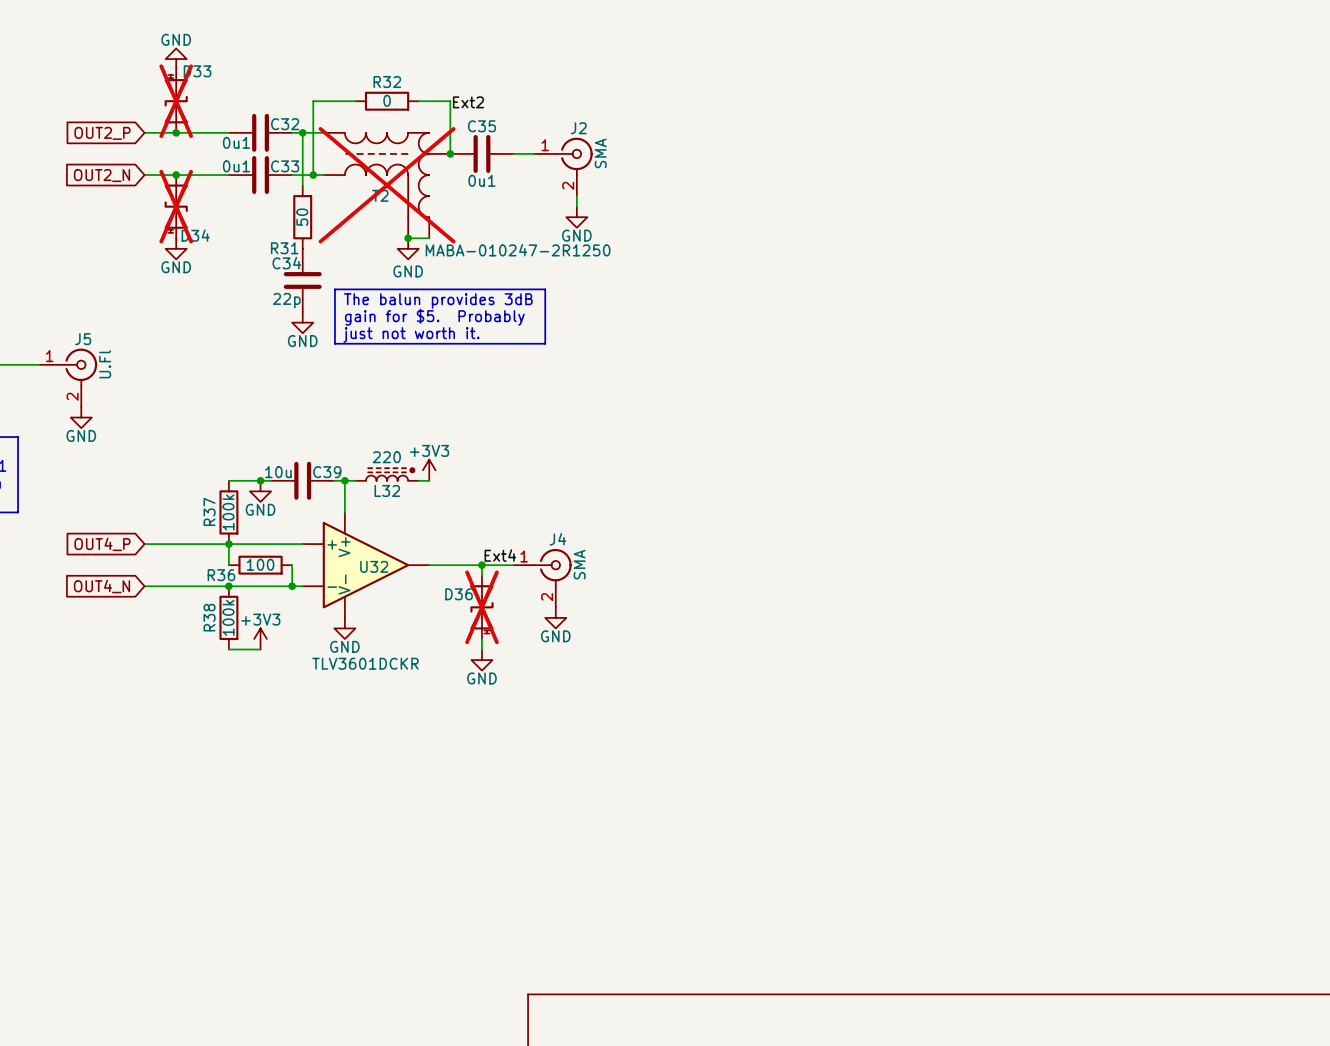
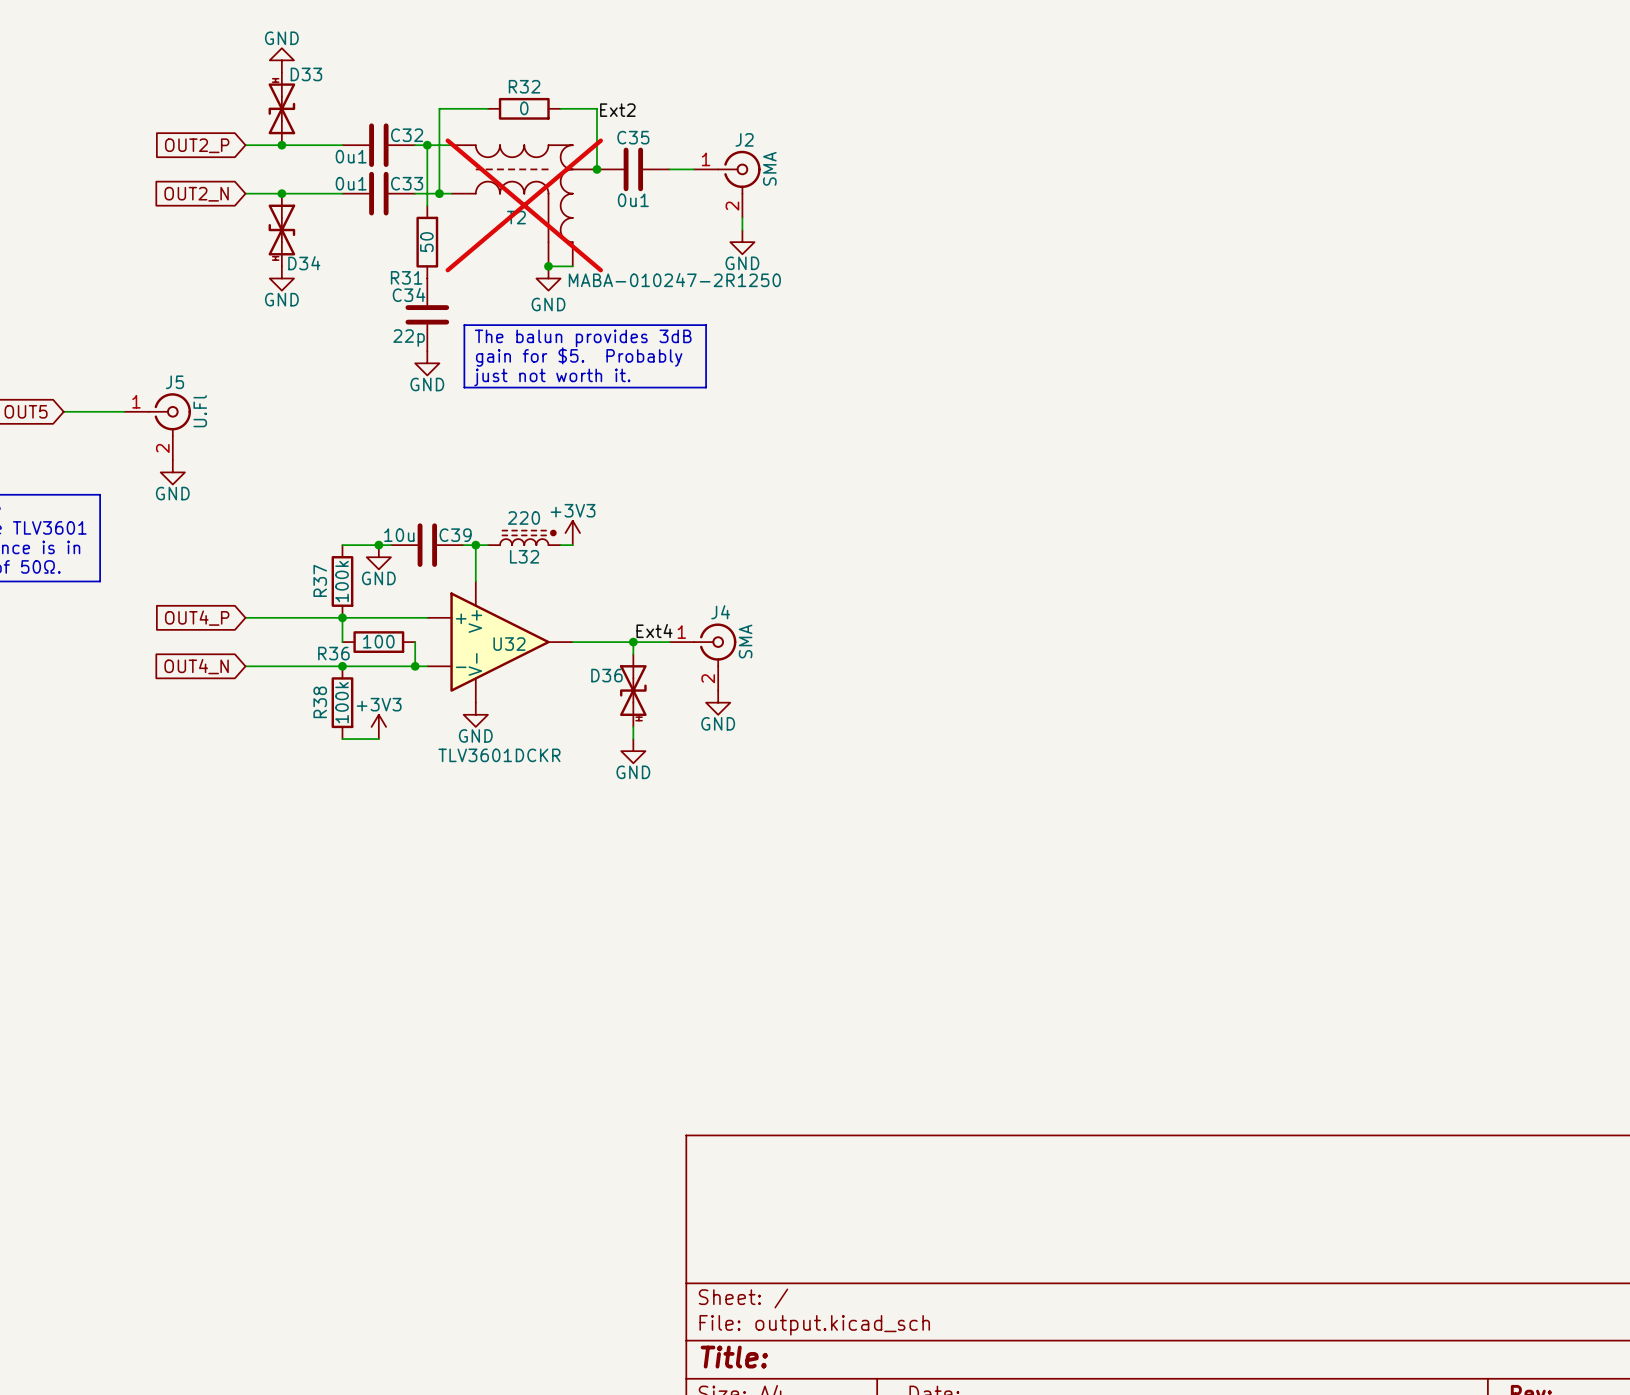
D33 do-not-place cross: (176, 101) -> none
D34 do-not-place cross: (176, 206) -> none
D36 do-not-place cross: (481, 607) -> none

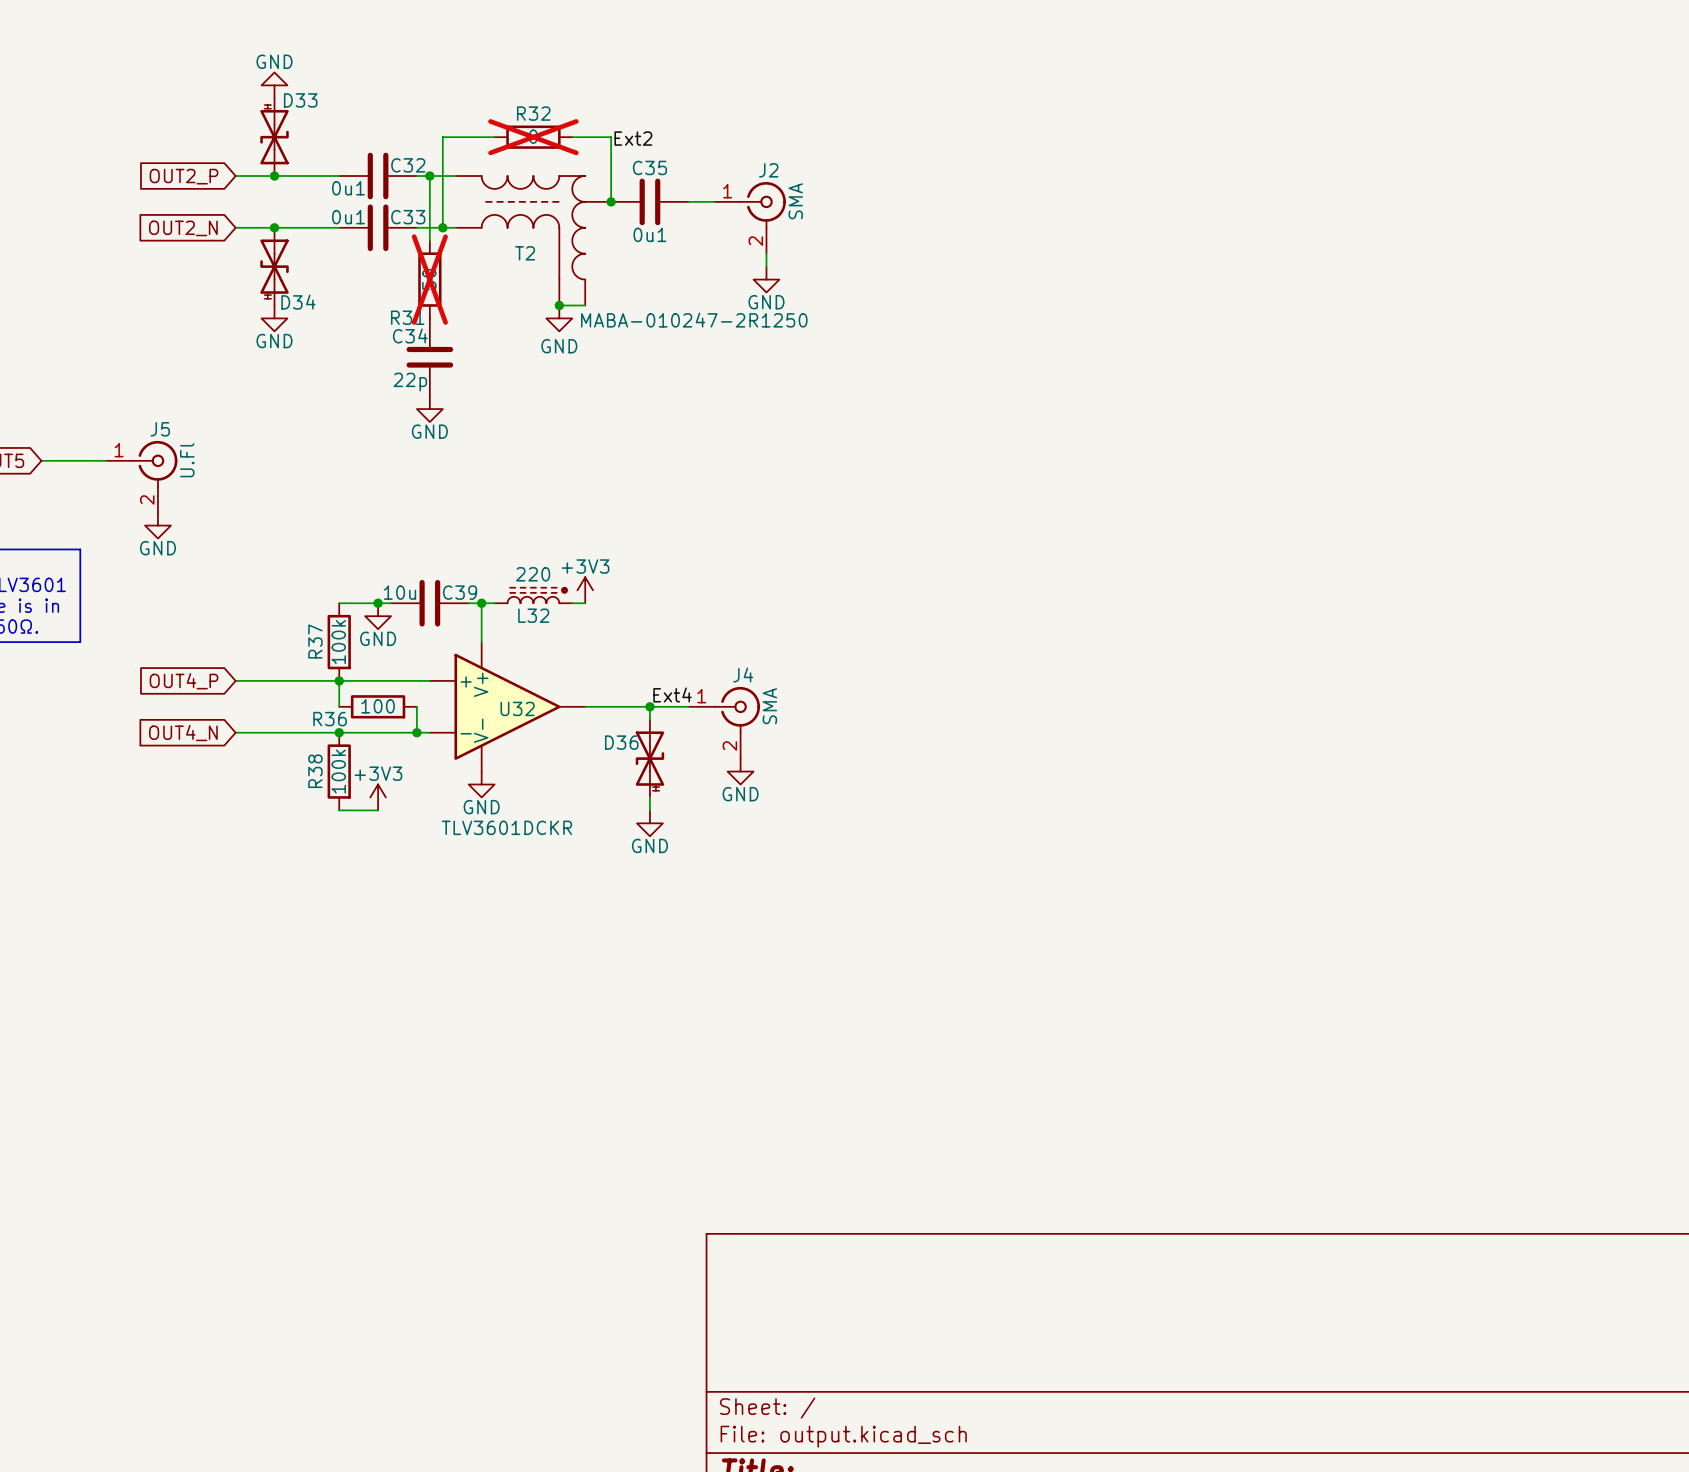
R32 do-not-place cross: none -> (533, 137)
T2 do-not-place cross: (524, 205) -> none
R31 do-not-place cross: none -> (429, 279)
line: (464, 325) (706, 325) (706, 387) (464, 387) (464, 325) -> none
text: The balun provides 3dB (583, 338) -> none
text: gain for $5. Probably (579, 357) -> none
text: just not worth it. (552, 377) -> none

